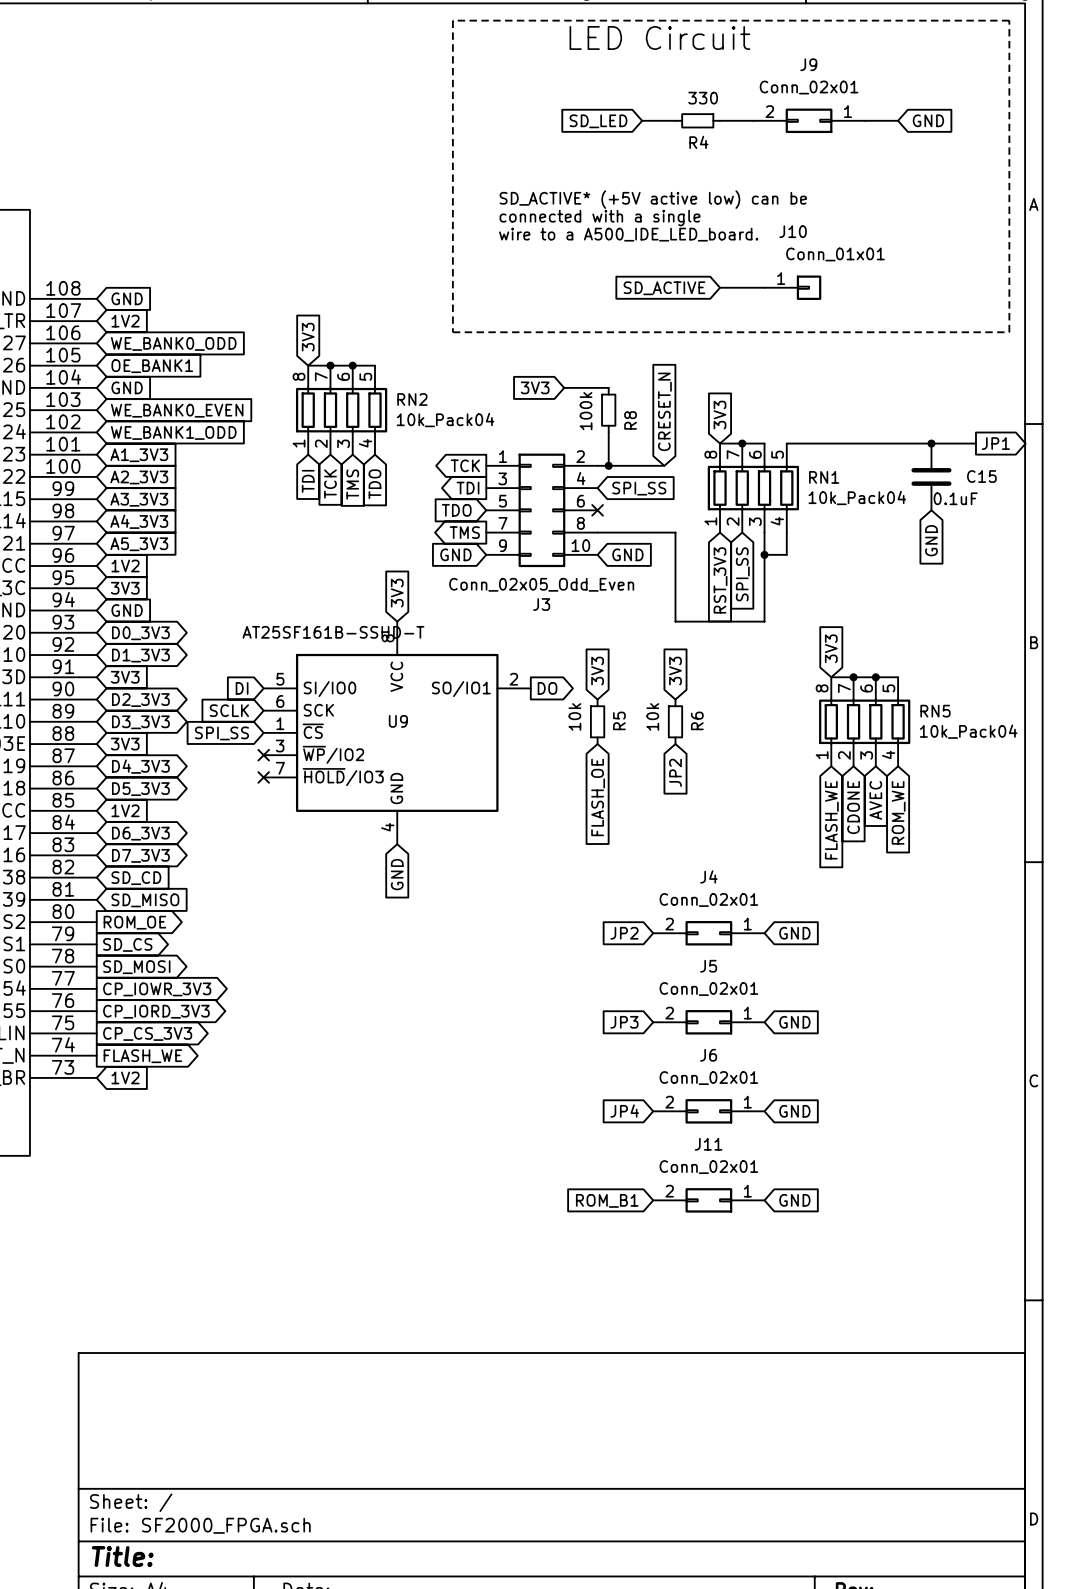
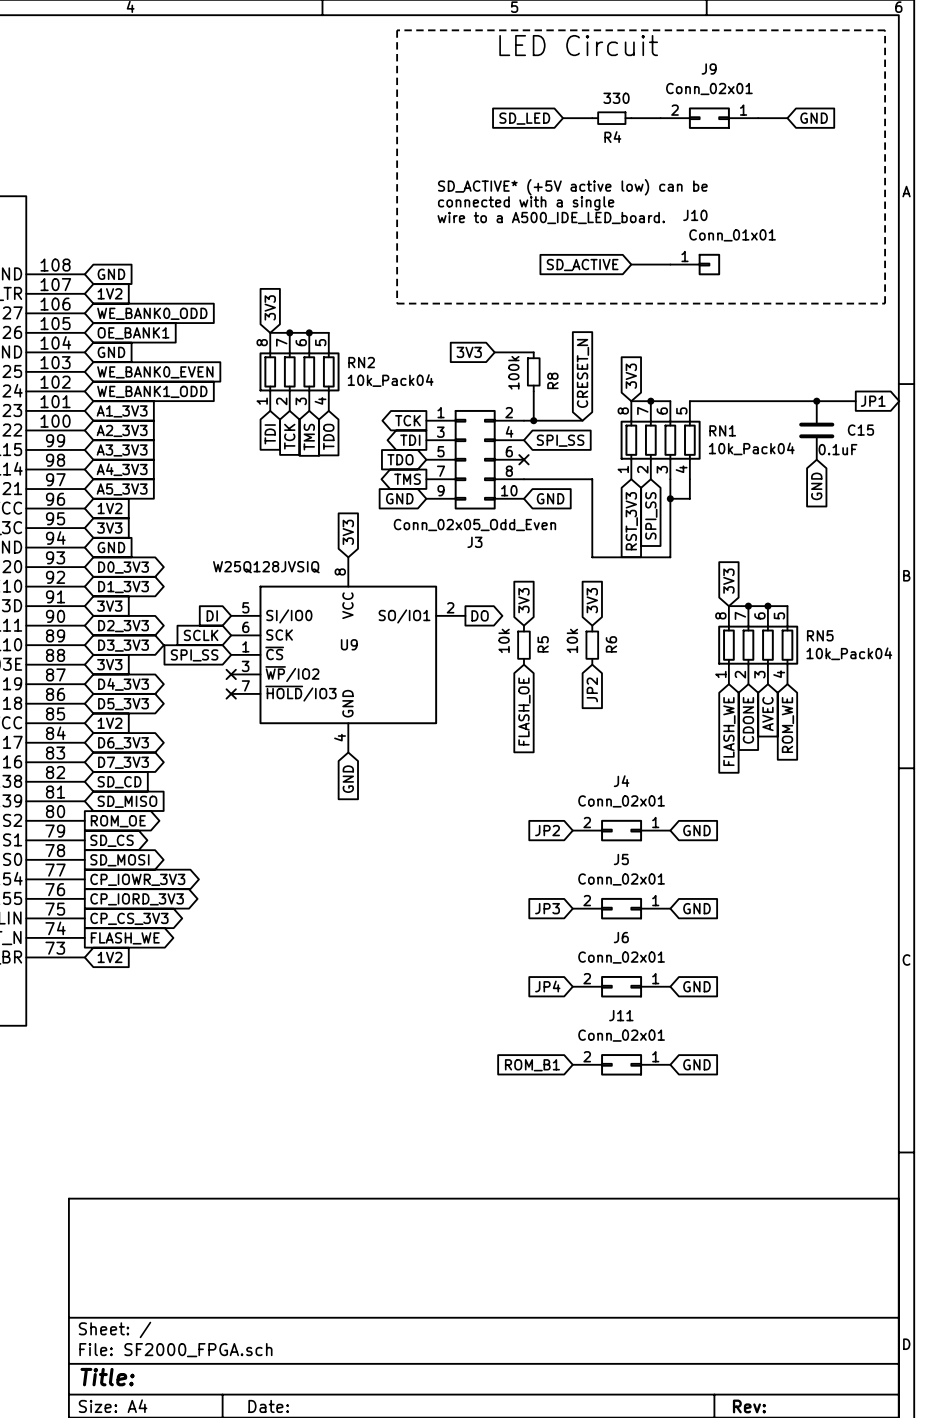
U9 value: AT25SF161B-SSHD-T (333, 632) -> W25Q128JVSIQ (266, 567)

